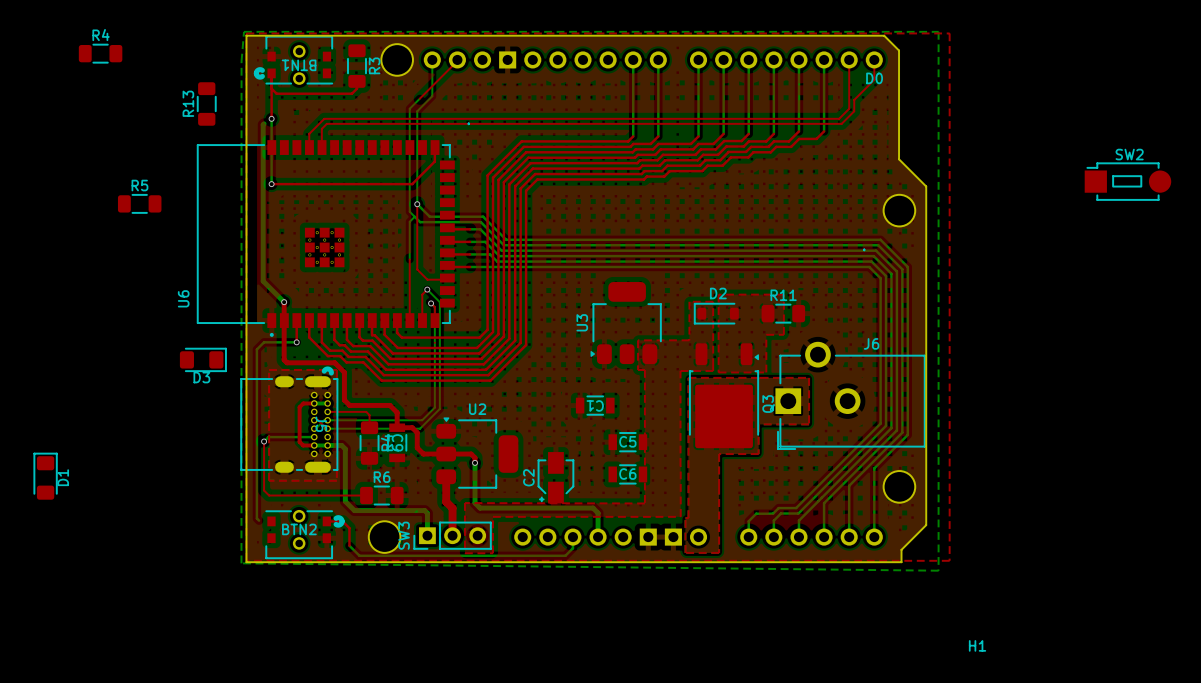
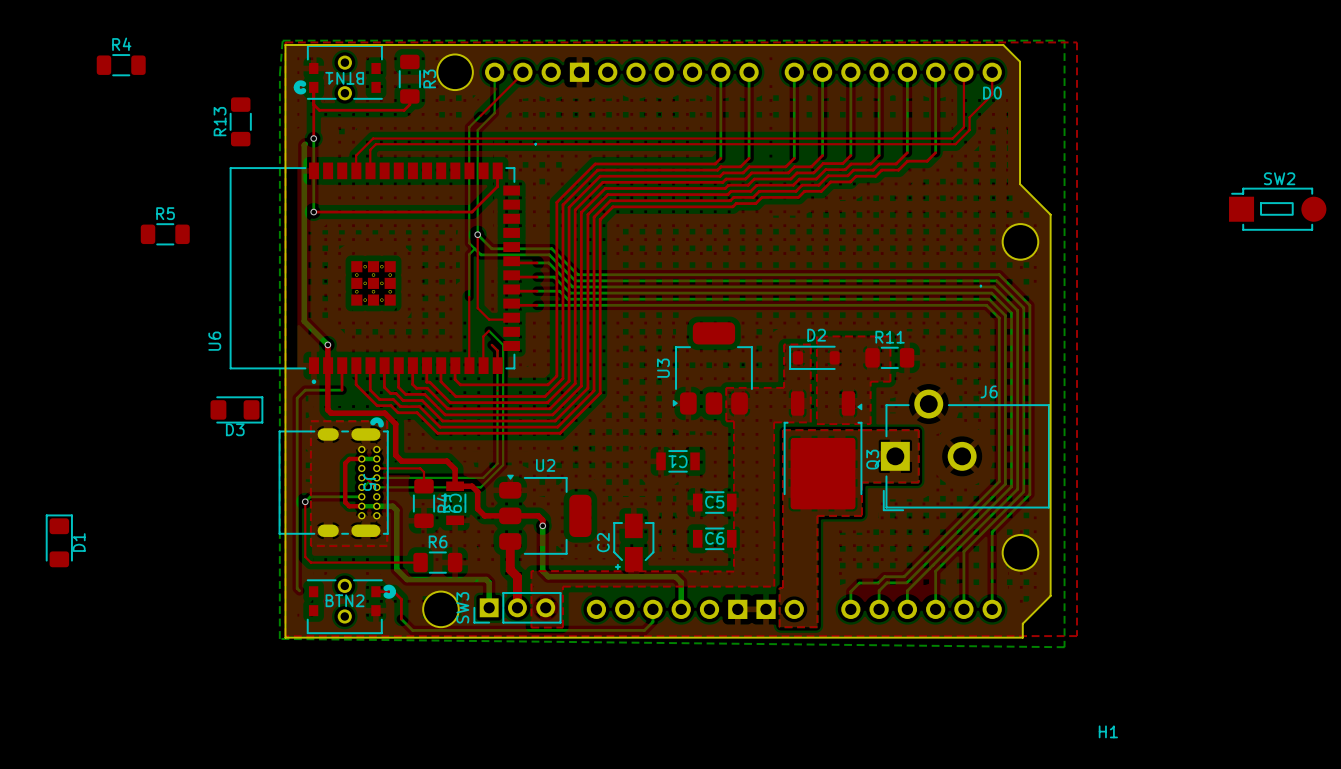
via: (427, 289) -> none
via: (431, 303) -> none
via: (296, 342) -> none

